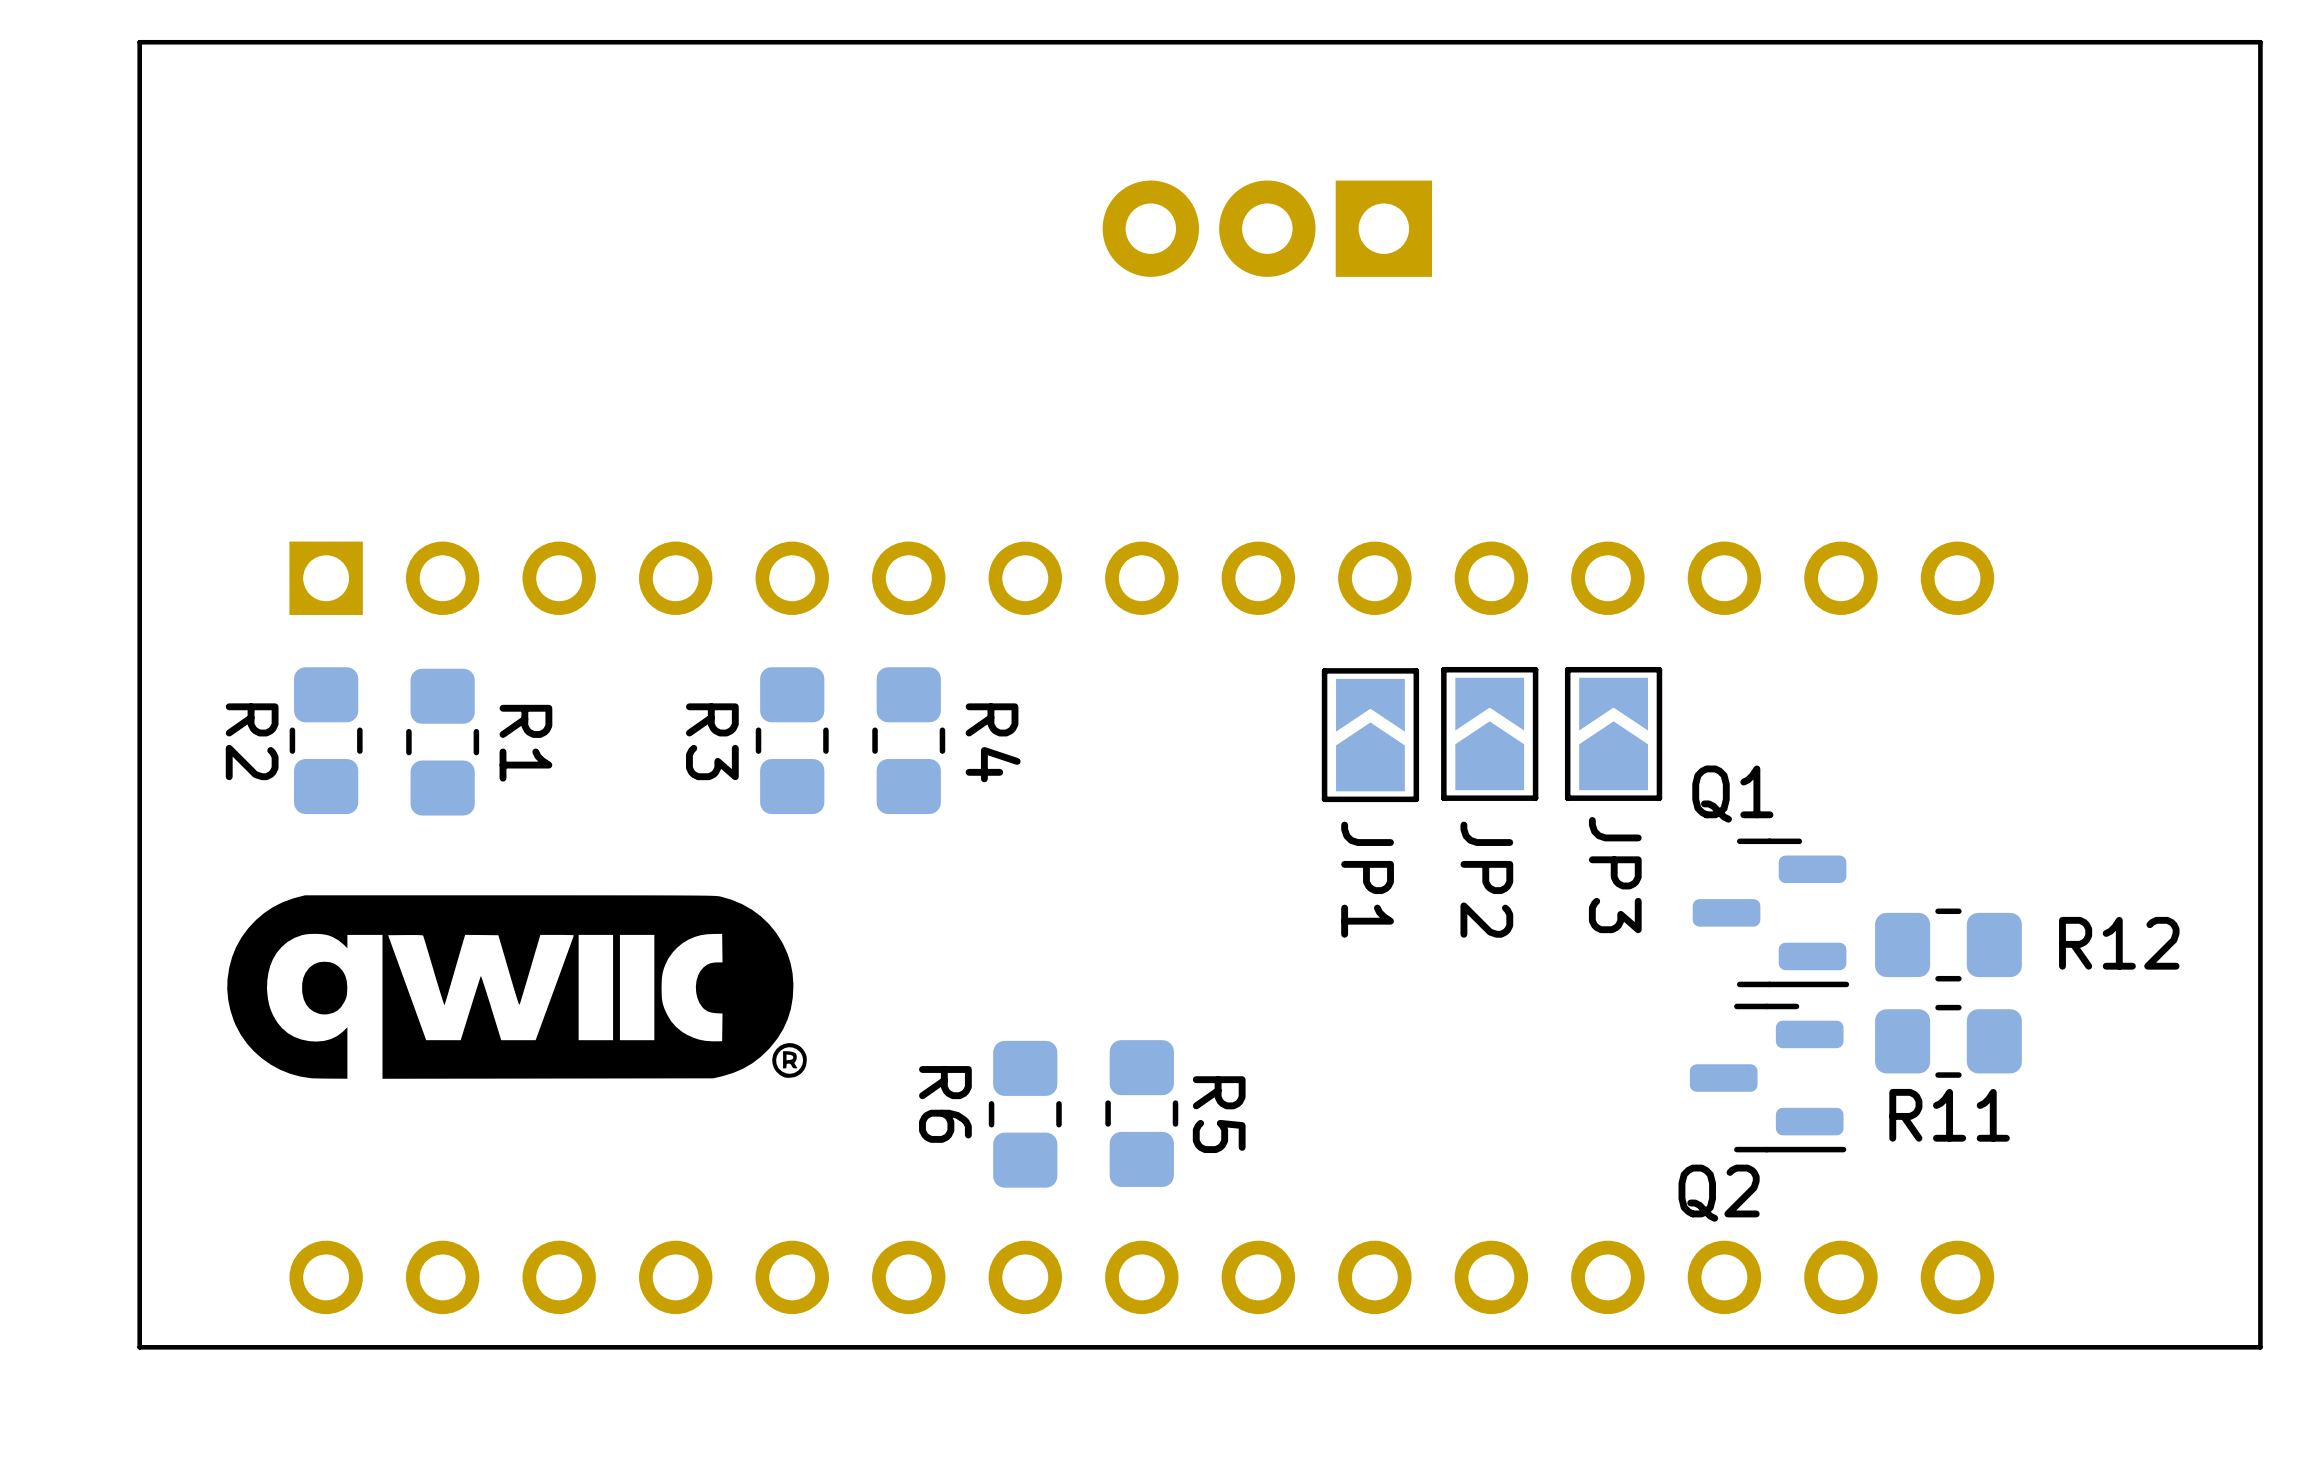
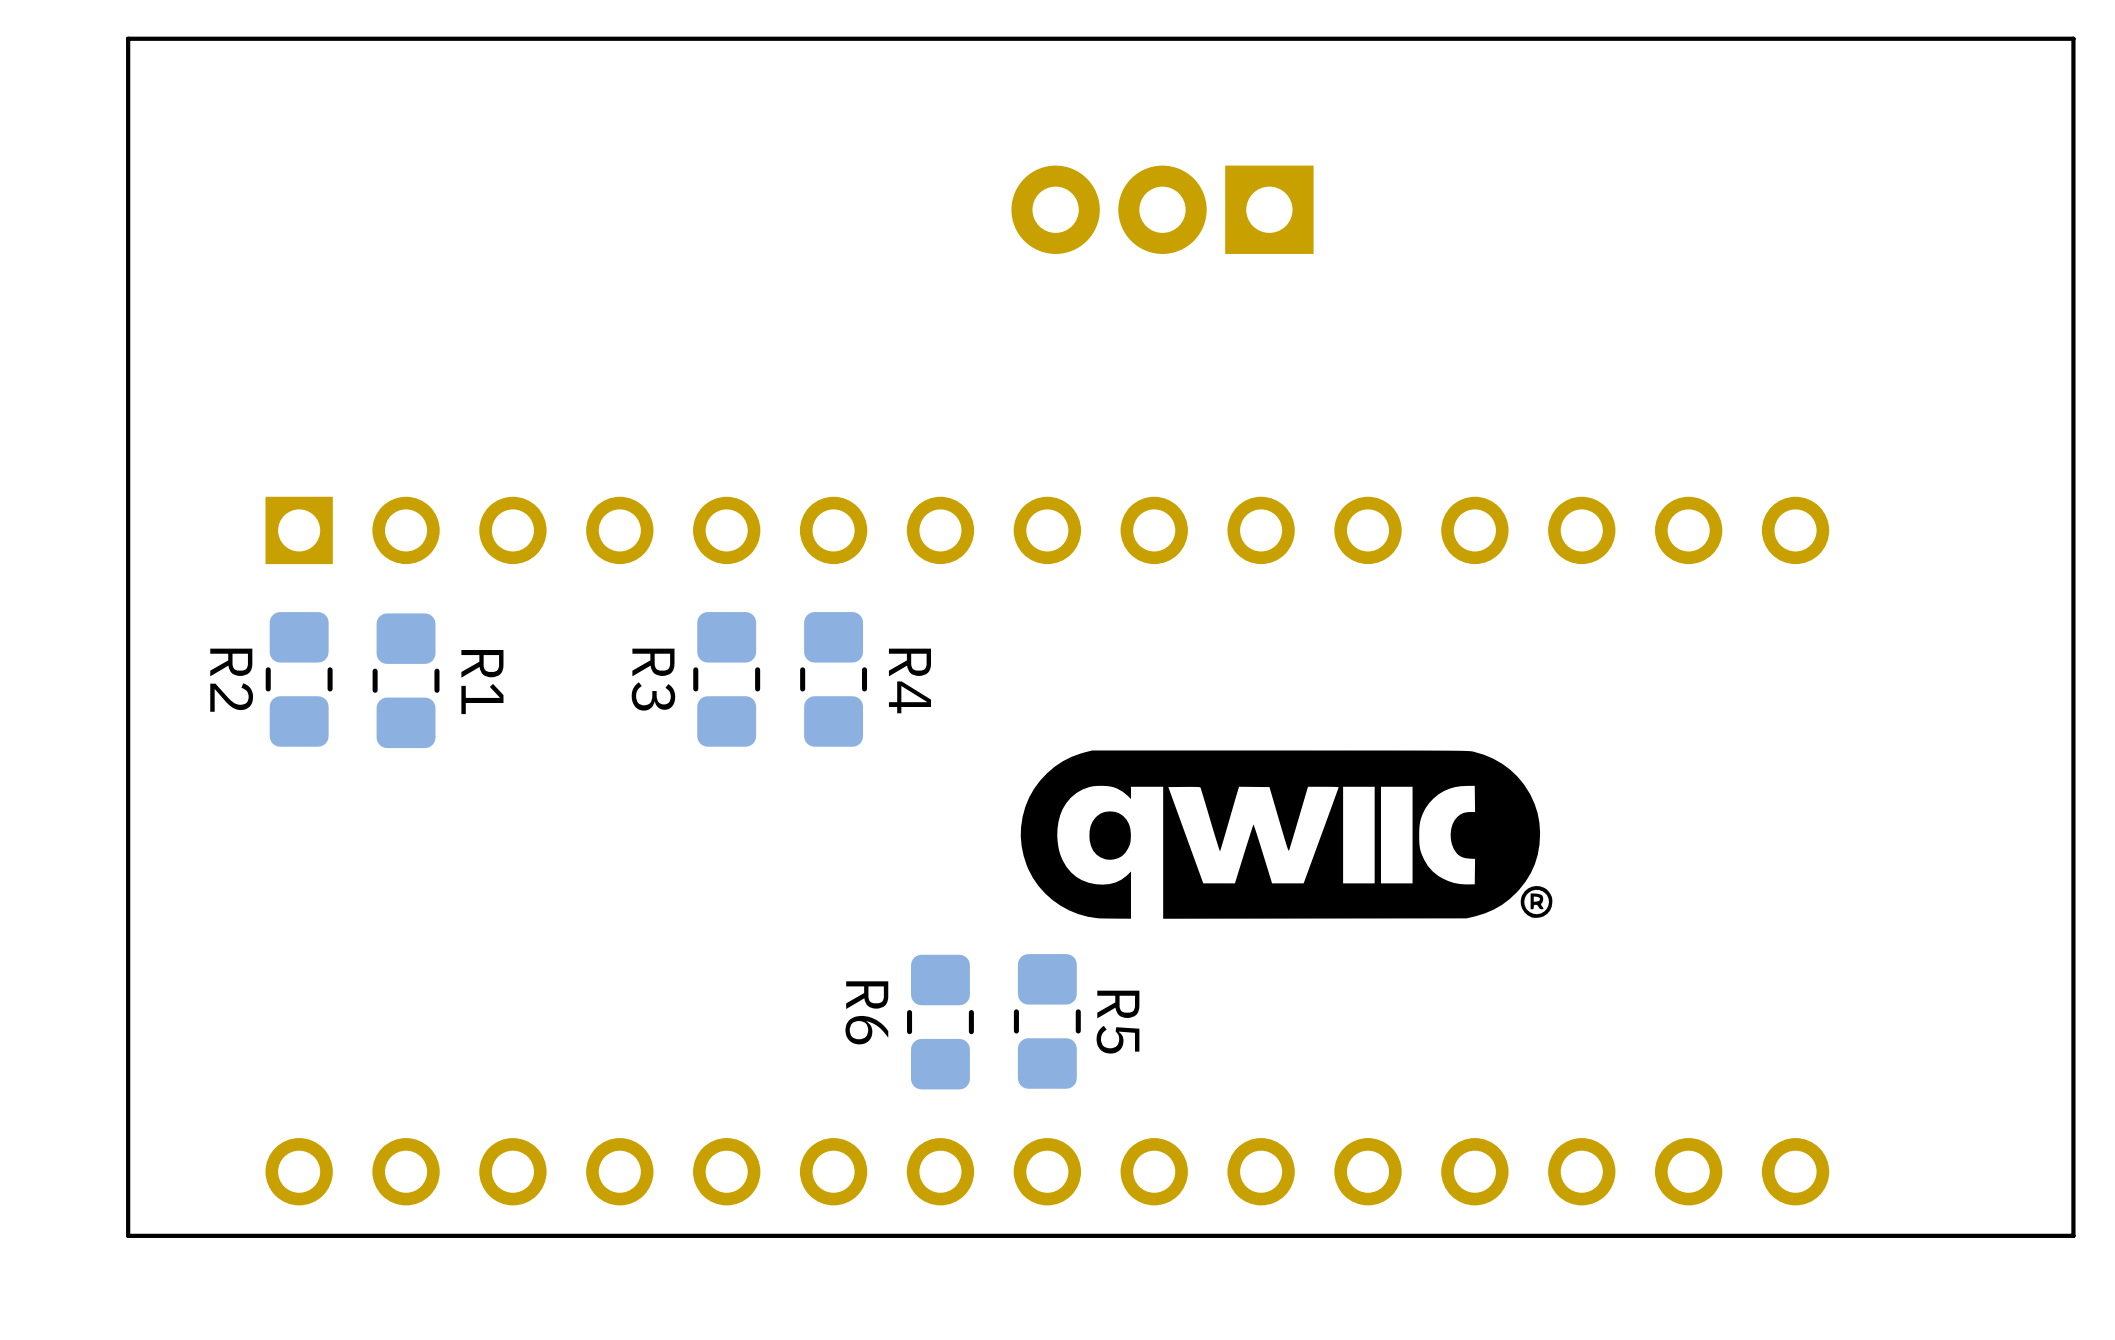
JP2: (1489, 733) -> none
JP3: (1613, 733) -> none
JP1: (1370, 735) -> none
Q1: (1770, 912) -> none
R12: (1948, 944) -> none
drawing position: (517, 987) -> (1286, 834)
R11: (1948, 1041) -> none
Q2: (1768, 1078) -> none

